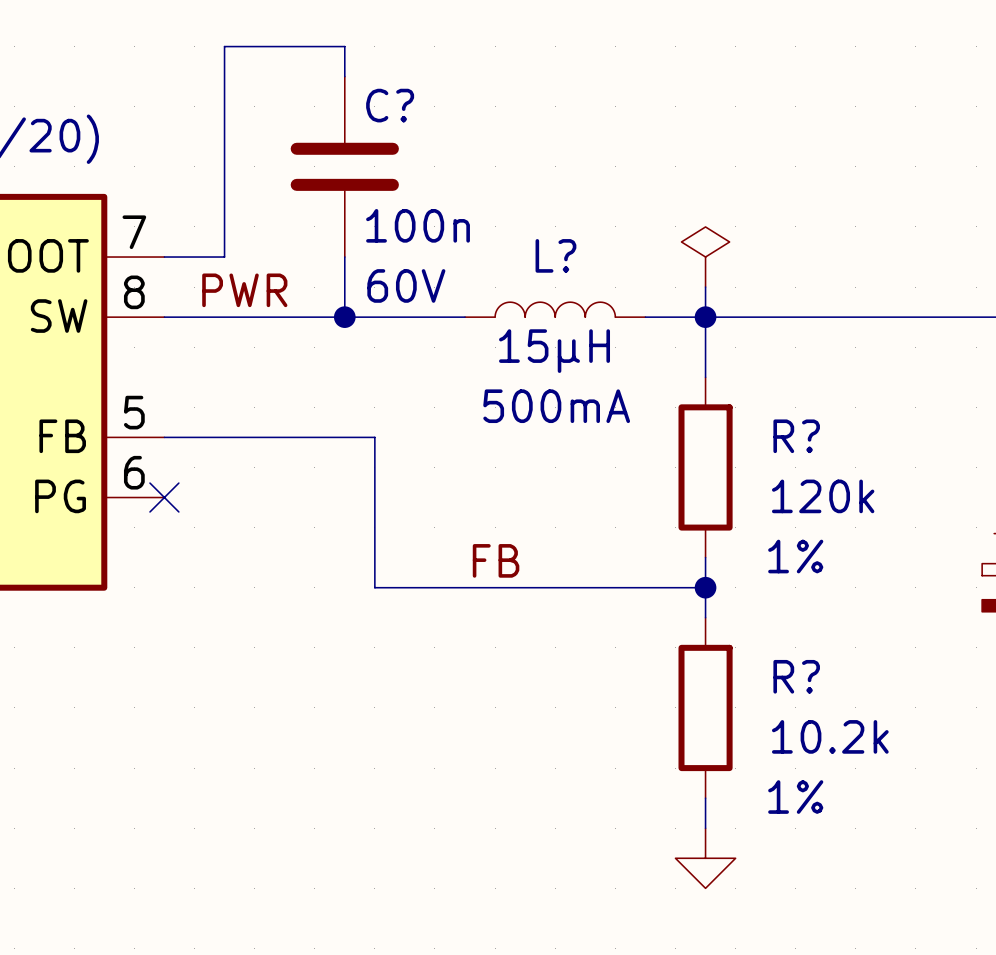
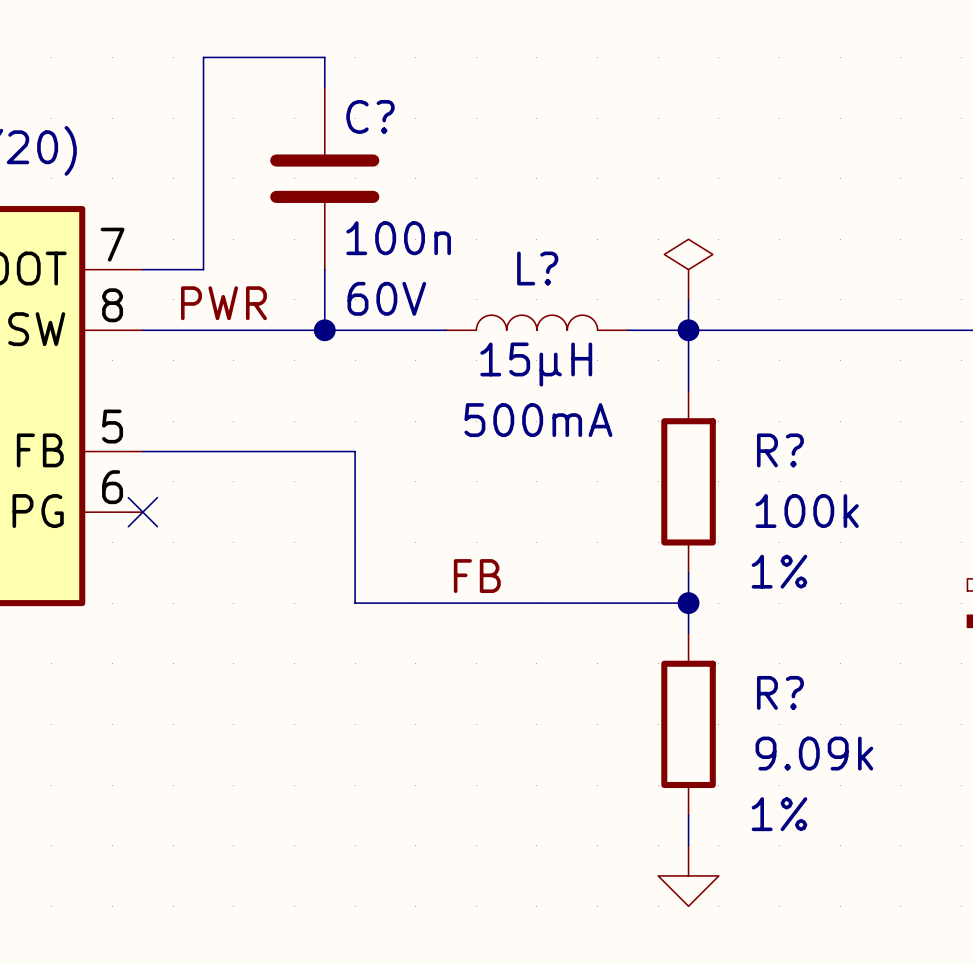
R? value: 120k (823, 496) -> 100k (807, 511)
R? value: 10.2k (830, 736) -> 9.09k (814, 753)

